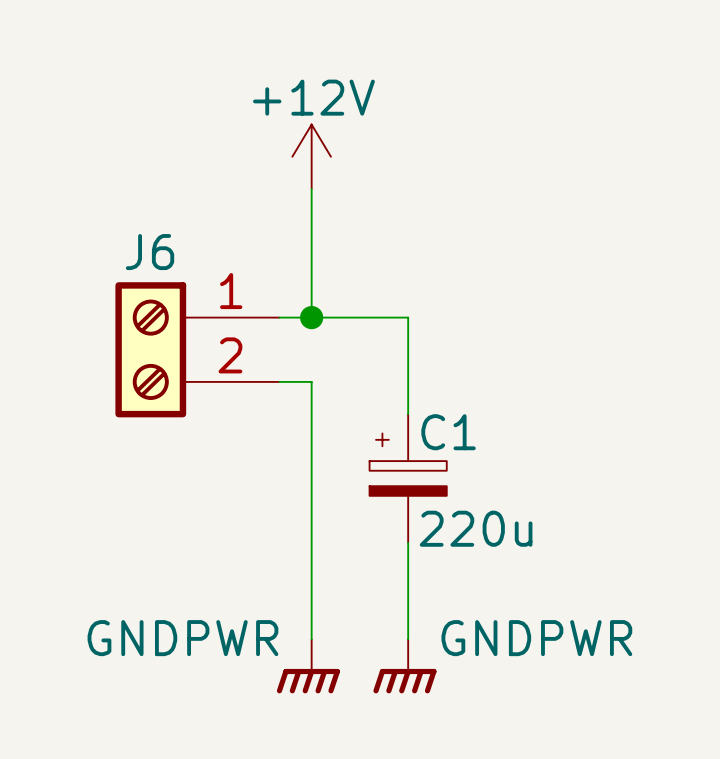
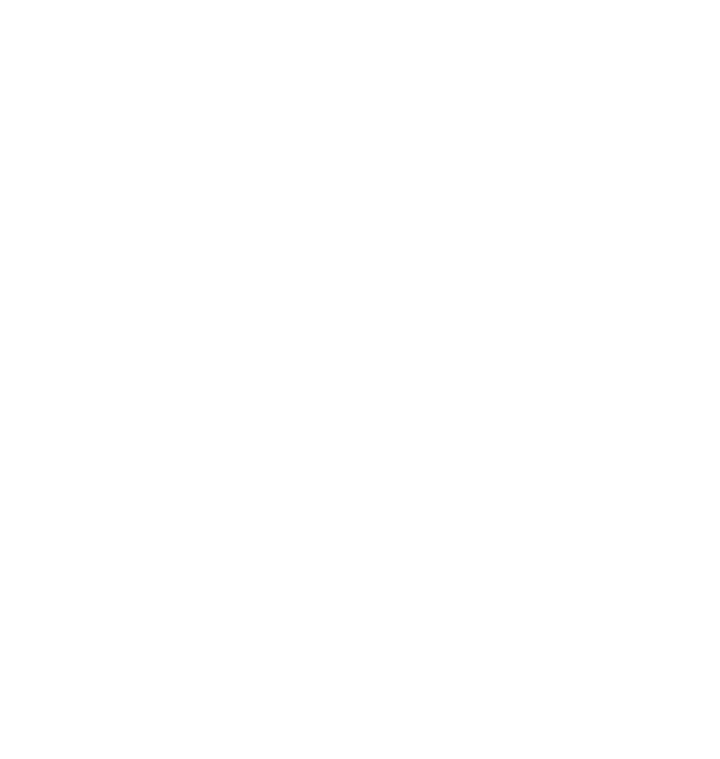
power symbol: +12V (311, 156) -> none
wire: (311, 188) (311, 317) -> none
wire: (279, 317) (408, 317) (408, 414) -> none
junction: (311, 317) -> none
J6: (197, 349) -> none
wire: (279, 381) (311, 381) (311, 639) -> none
C1: 220u (408, 478) -> none
wire: (408, 542) (408, 639) -> none
power symbol: GNDPWR (308, 666) -> none
power symbol: GNDPWR (404, 666) -> none

